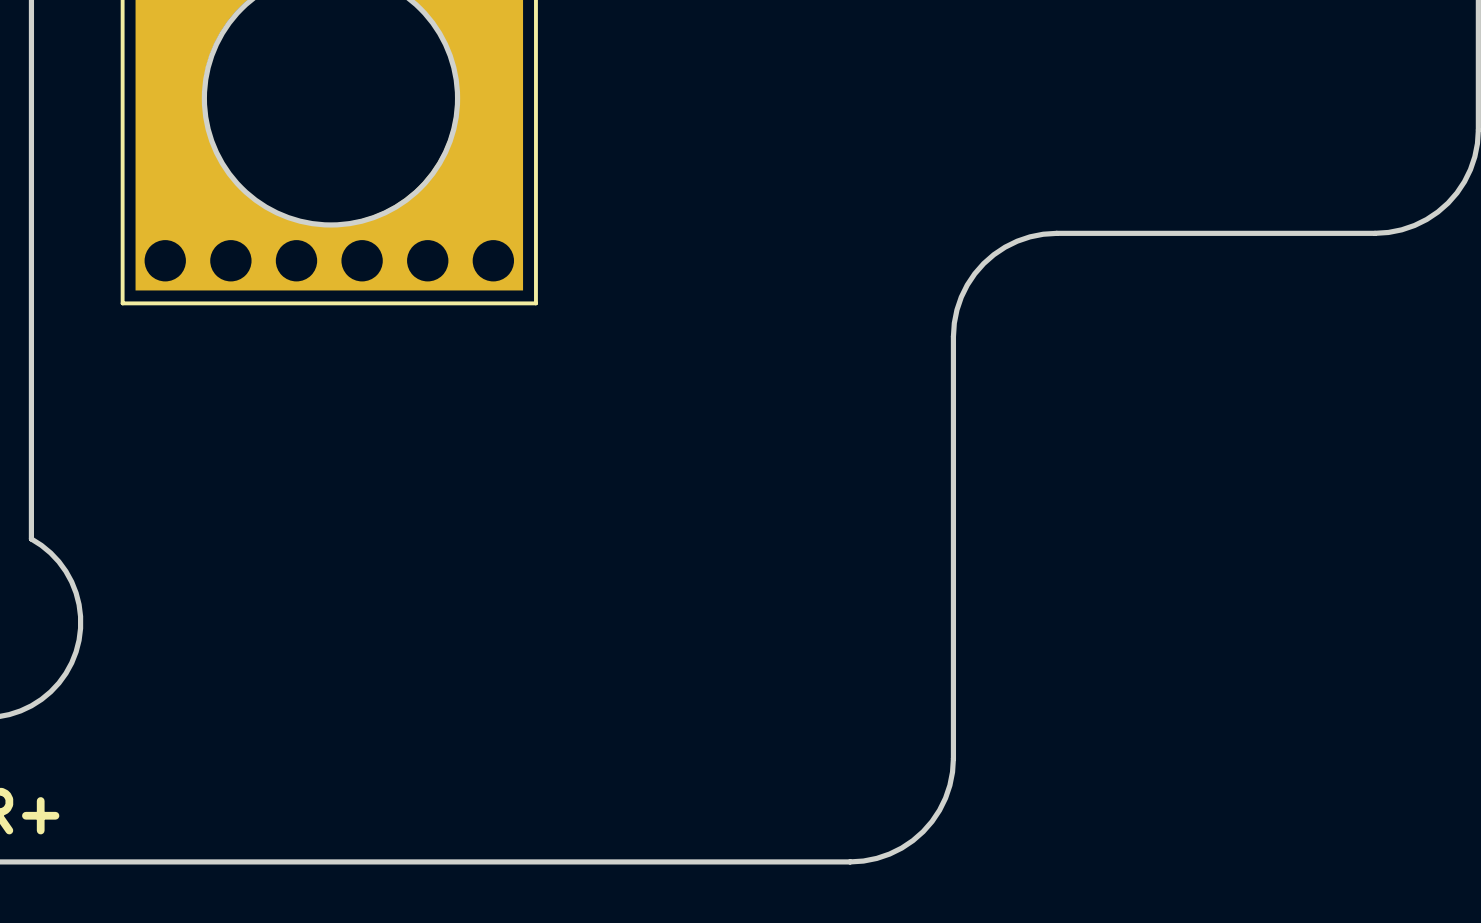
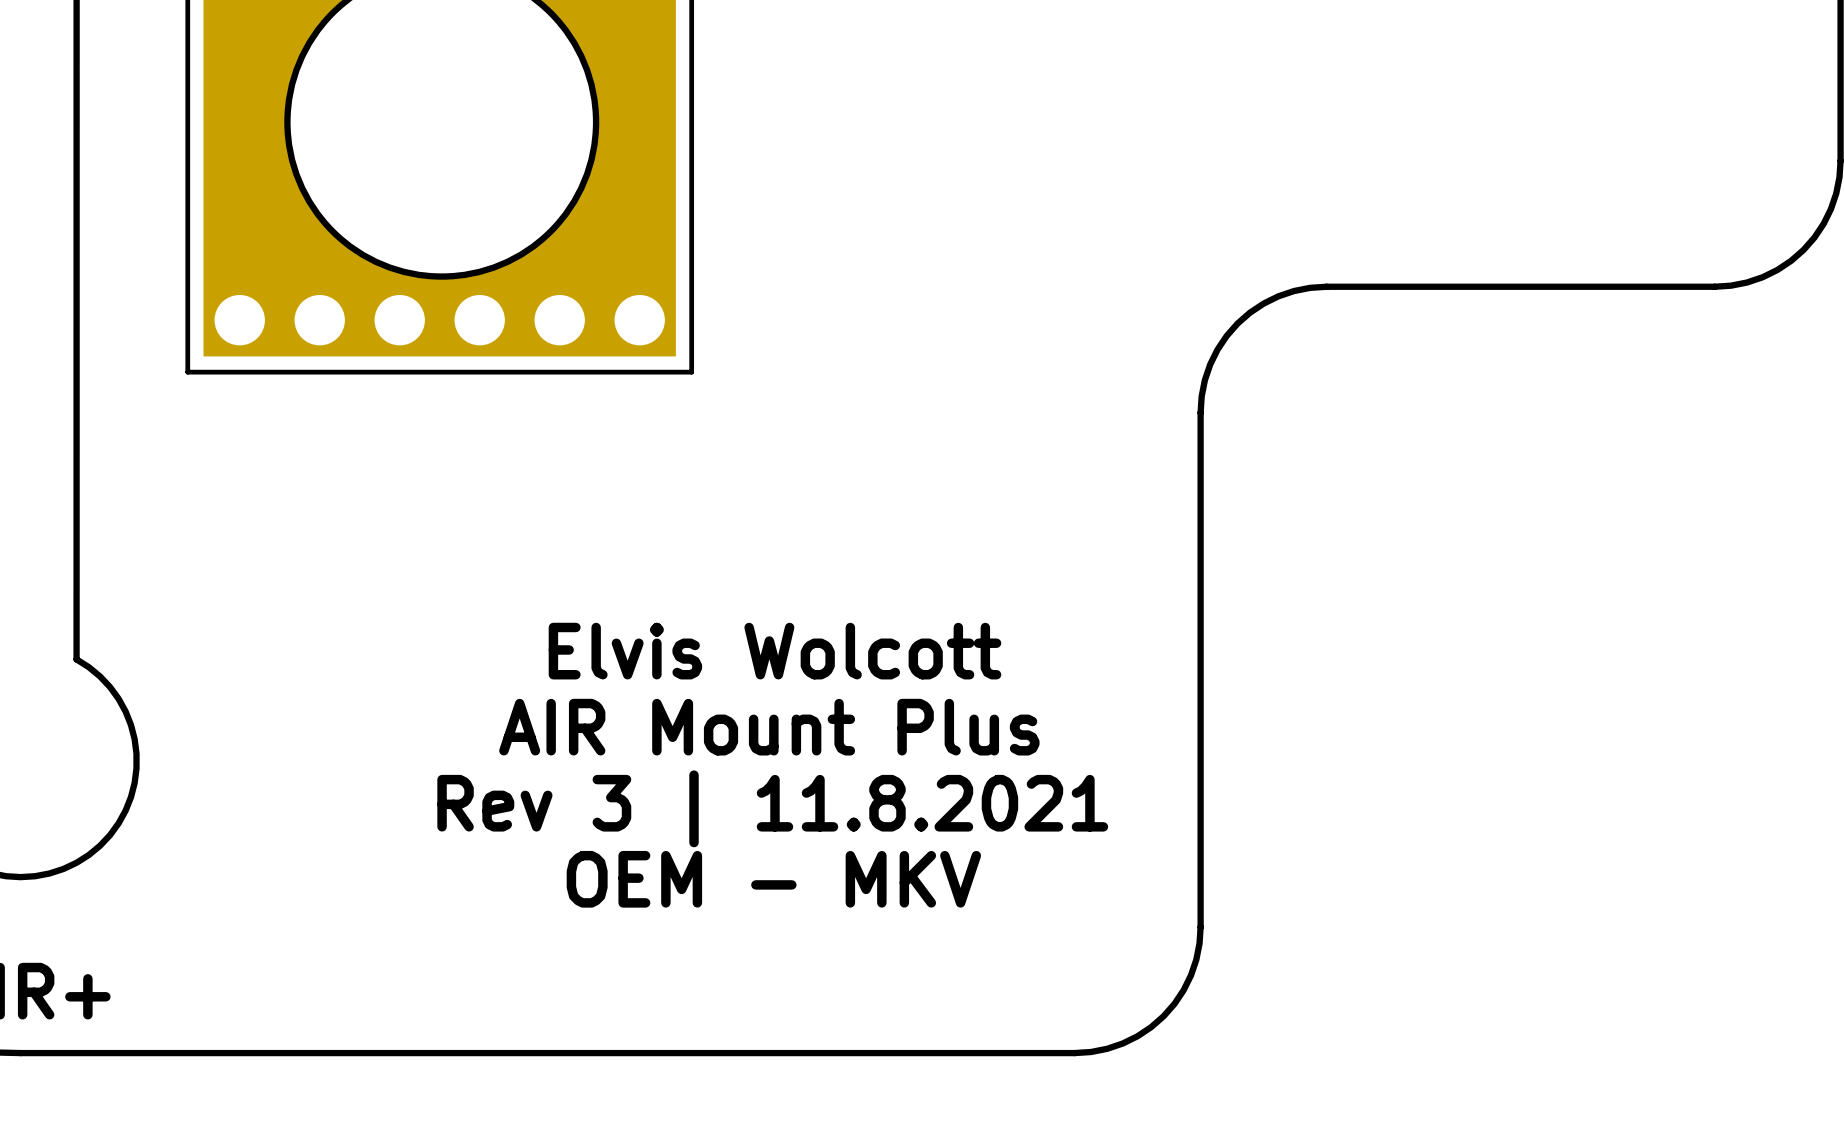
text: none -> Elvis Wolcott (775, 651)
text: none -> AIR Mount Plus (769, 727)
text: none -> Rev 3 | 11.8.2021 (772, 808)
text: none -> OEM - MKV (773, 879)

